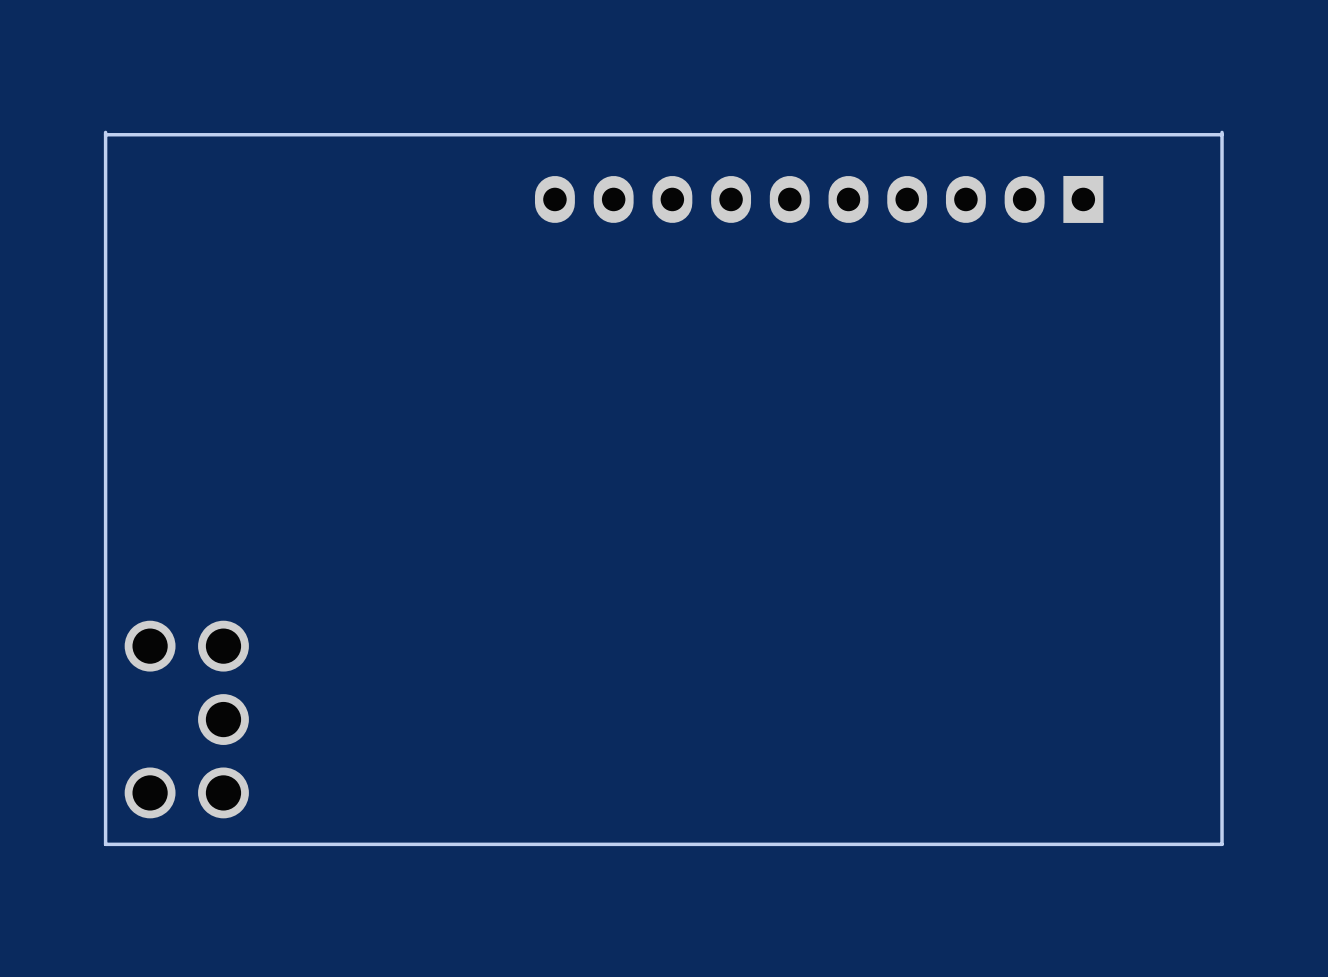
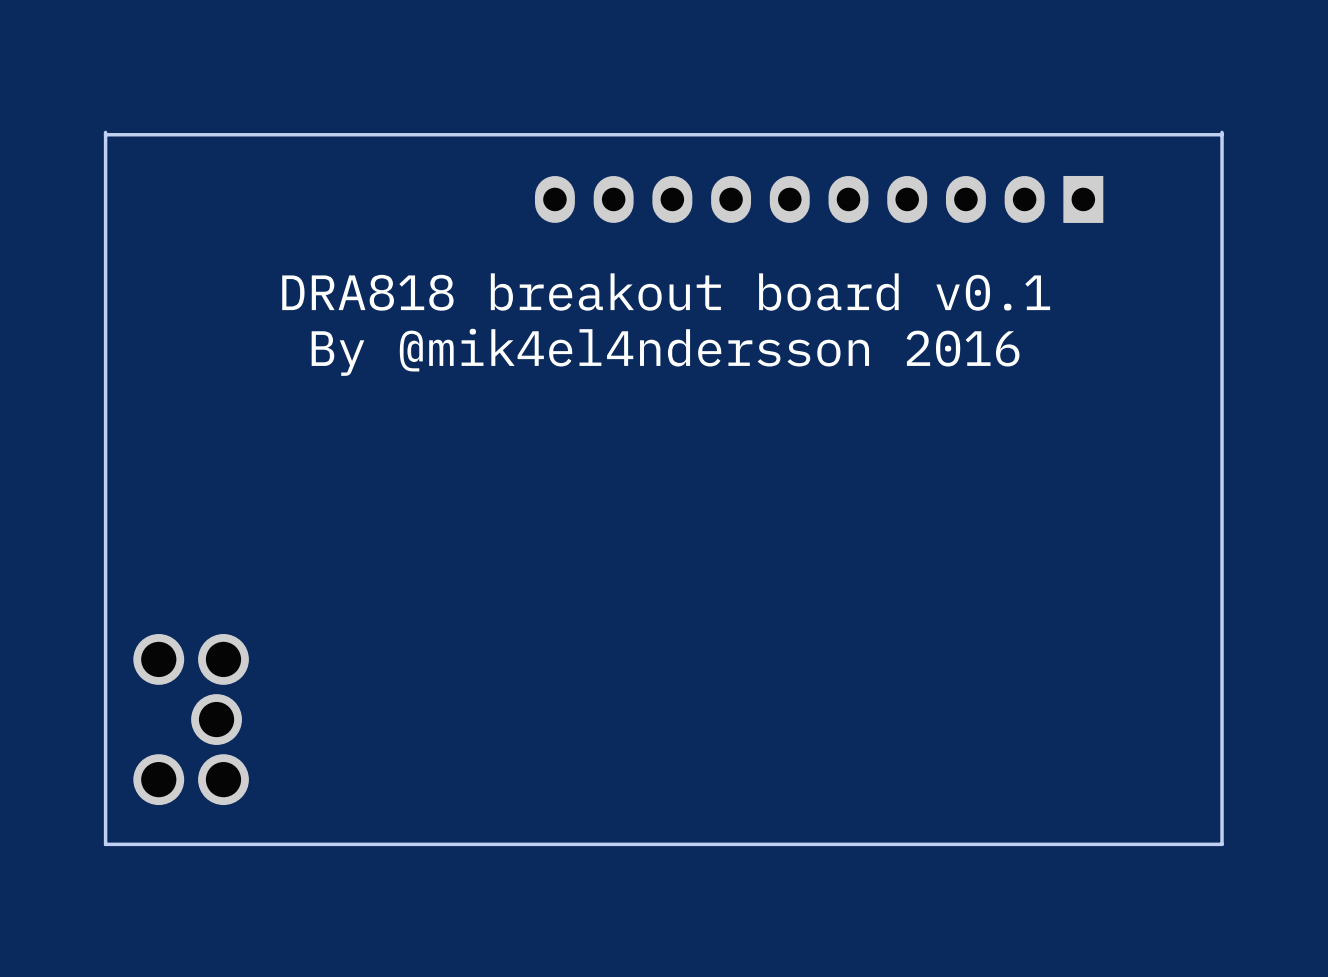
text: none -> DRA818 breakout board v0.1 (666, 292)
text: none -> By @mik4el4ndersson 2016 (665, 352)
part footprint: [124, 620, 249, 819] -> [133, 634, 249, 806]

